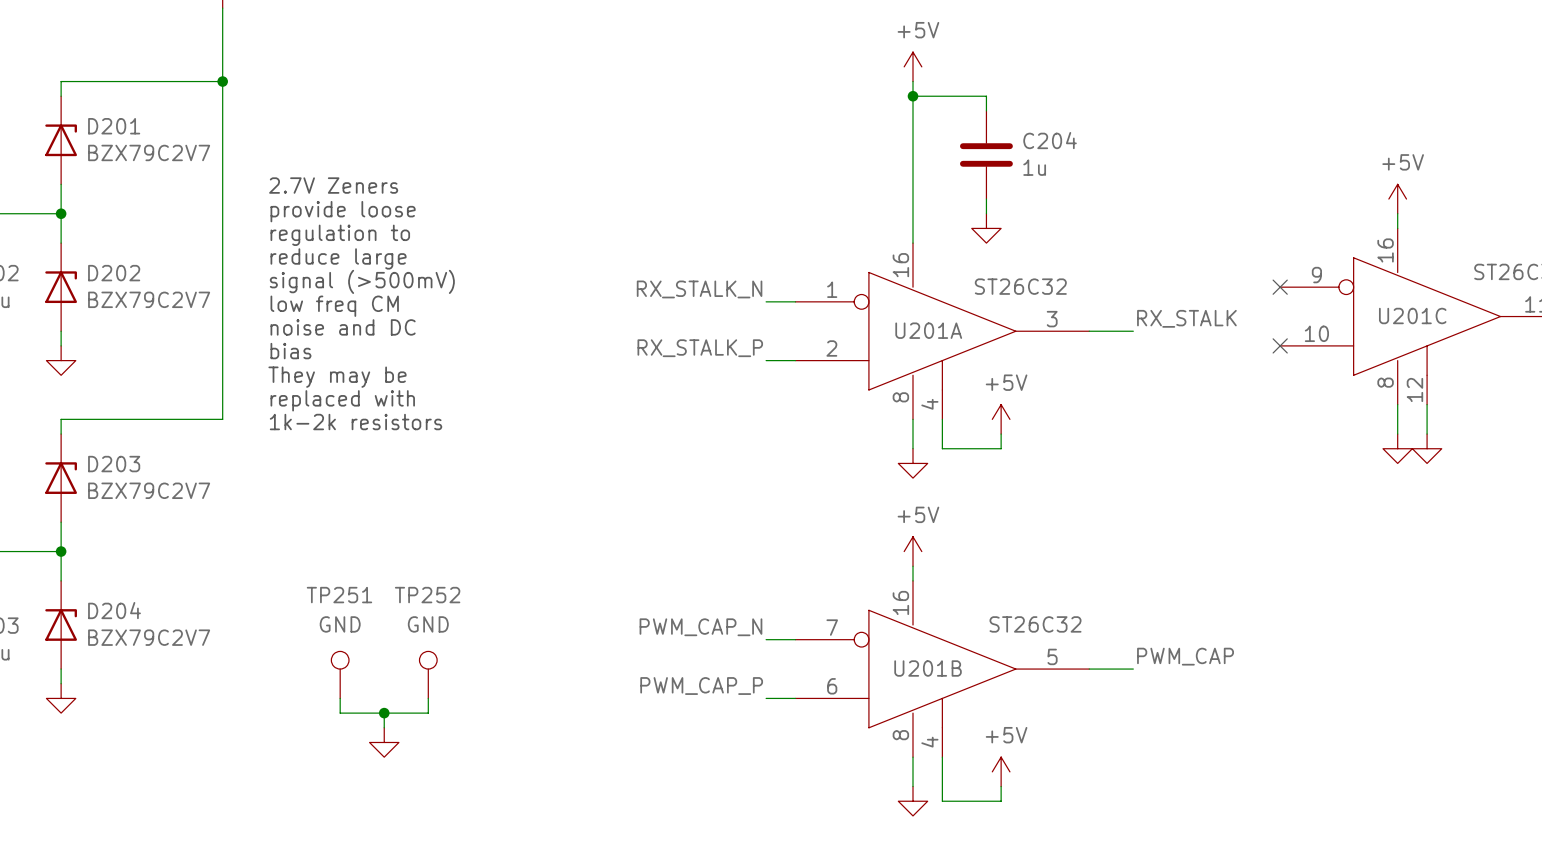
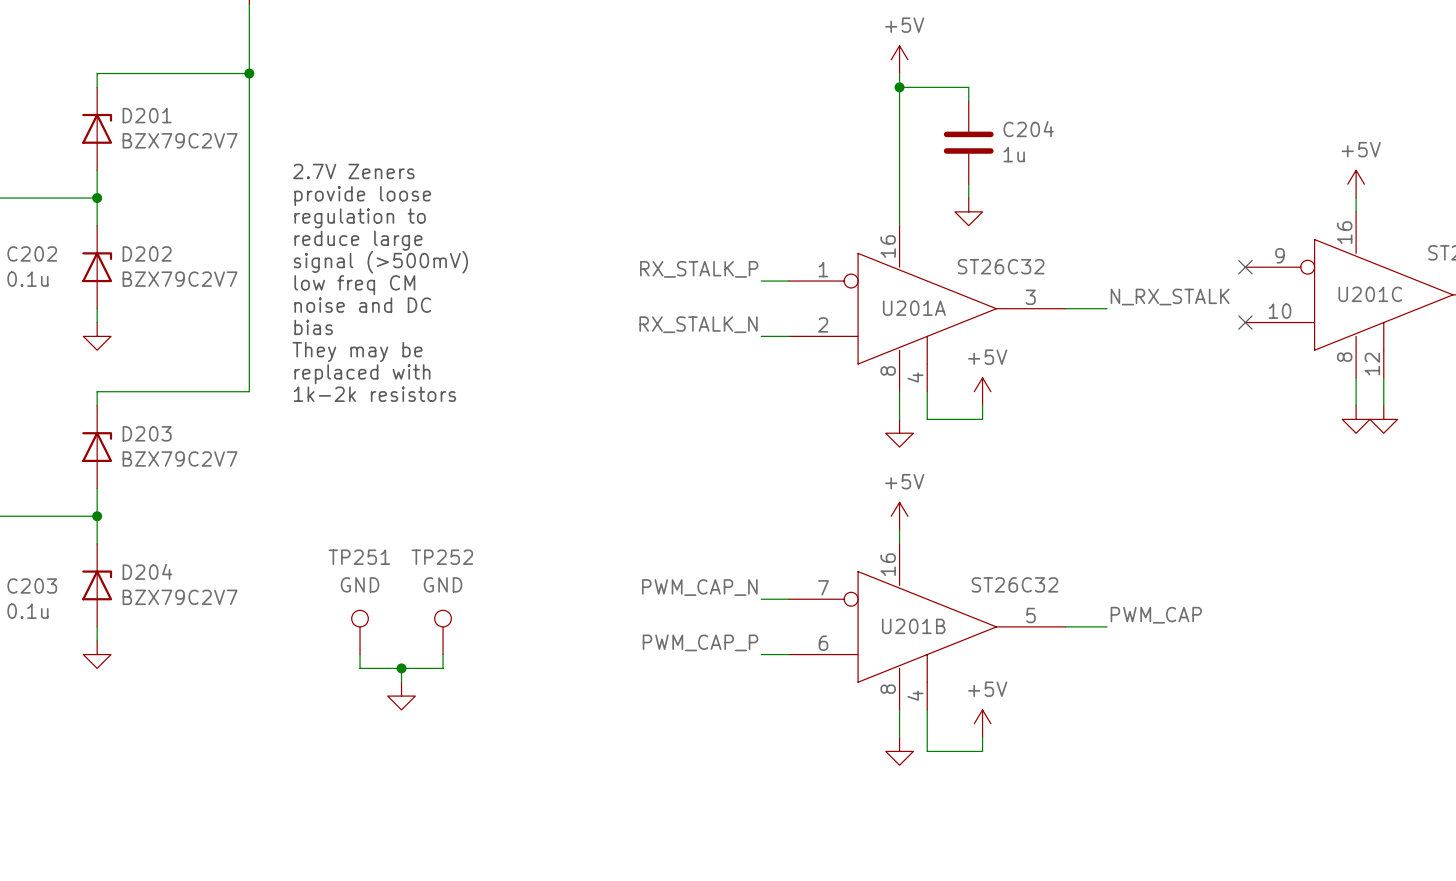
label: RX_STALK_N (699, 289) -> RX_STALK_P (699, 269)
label: RX_STALK (1186, 318) -> N_RX_STALK (1170, 297)
label: RX_STALK_P (700, 348) -> RX_STALK_N (698, 324)

